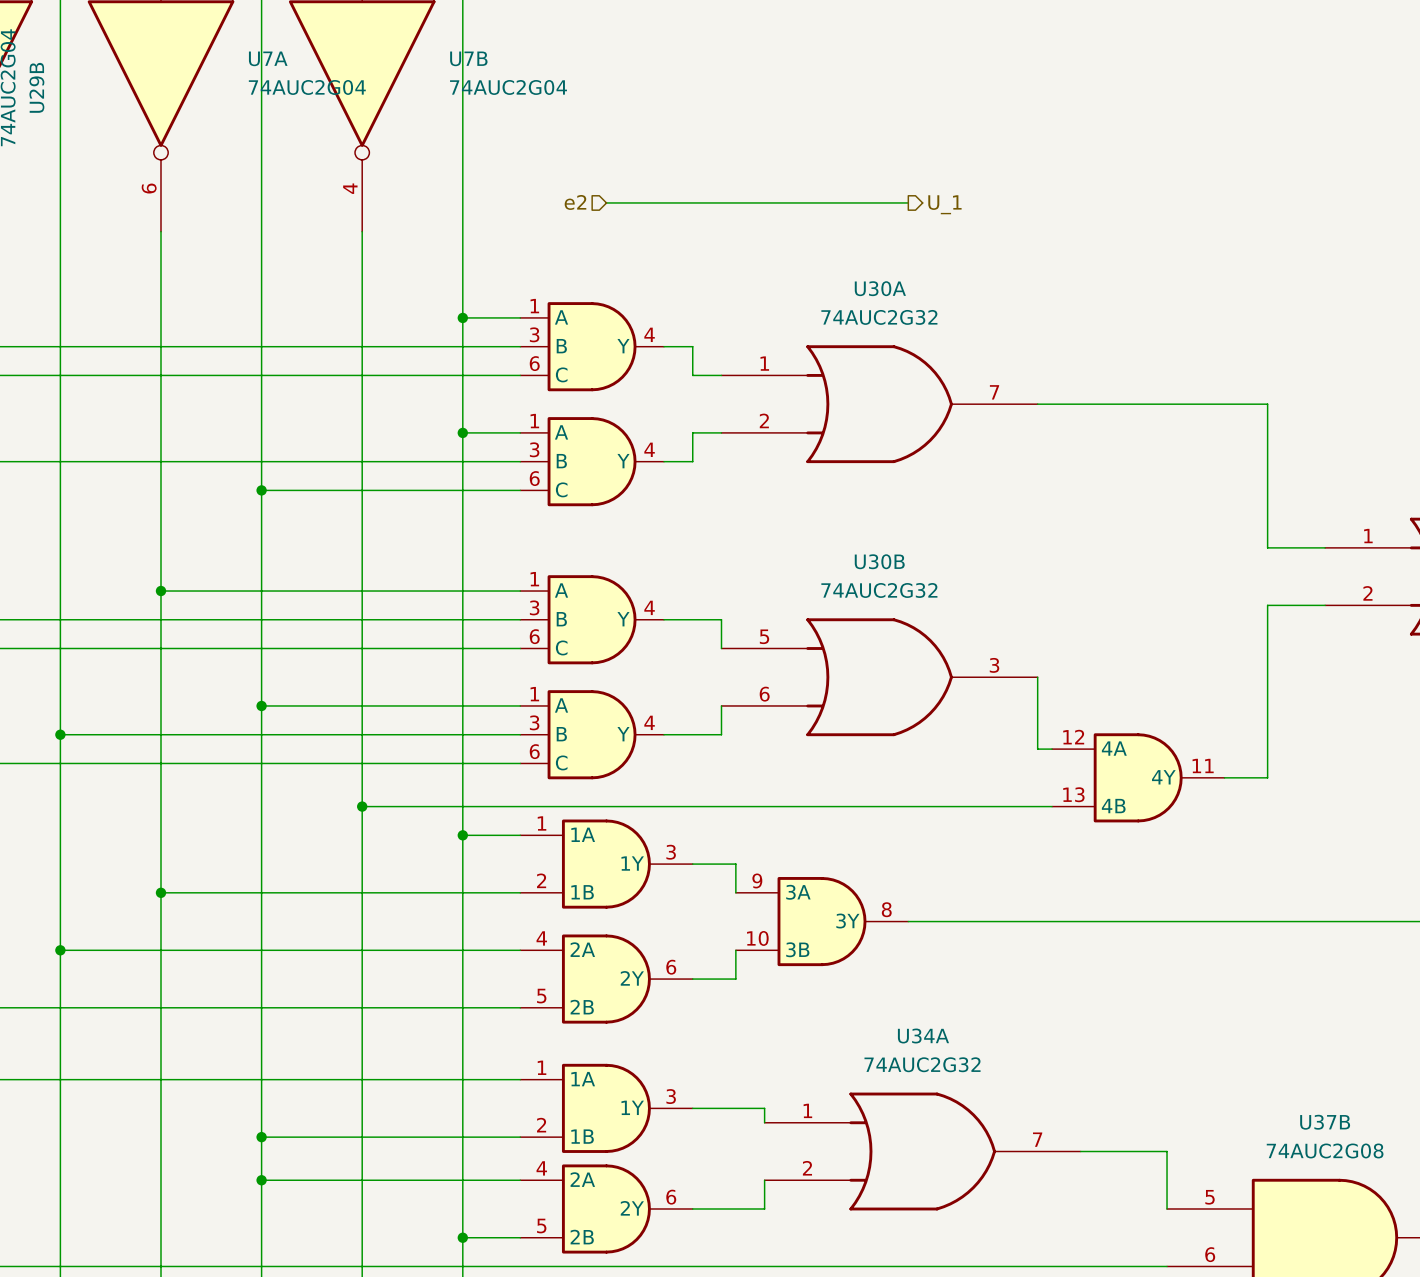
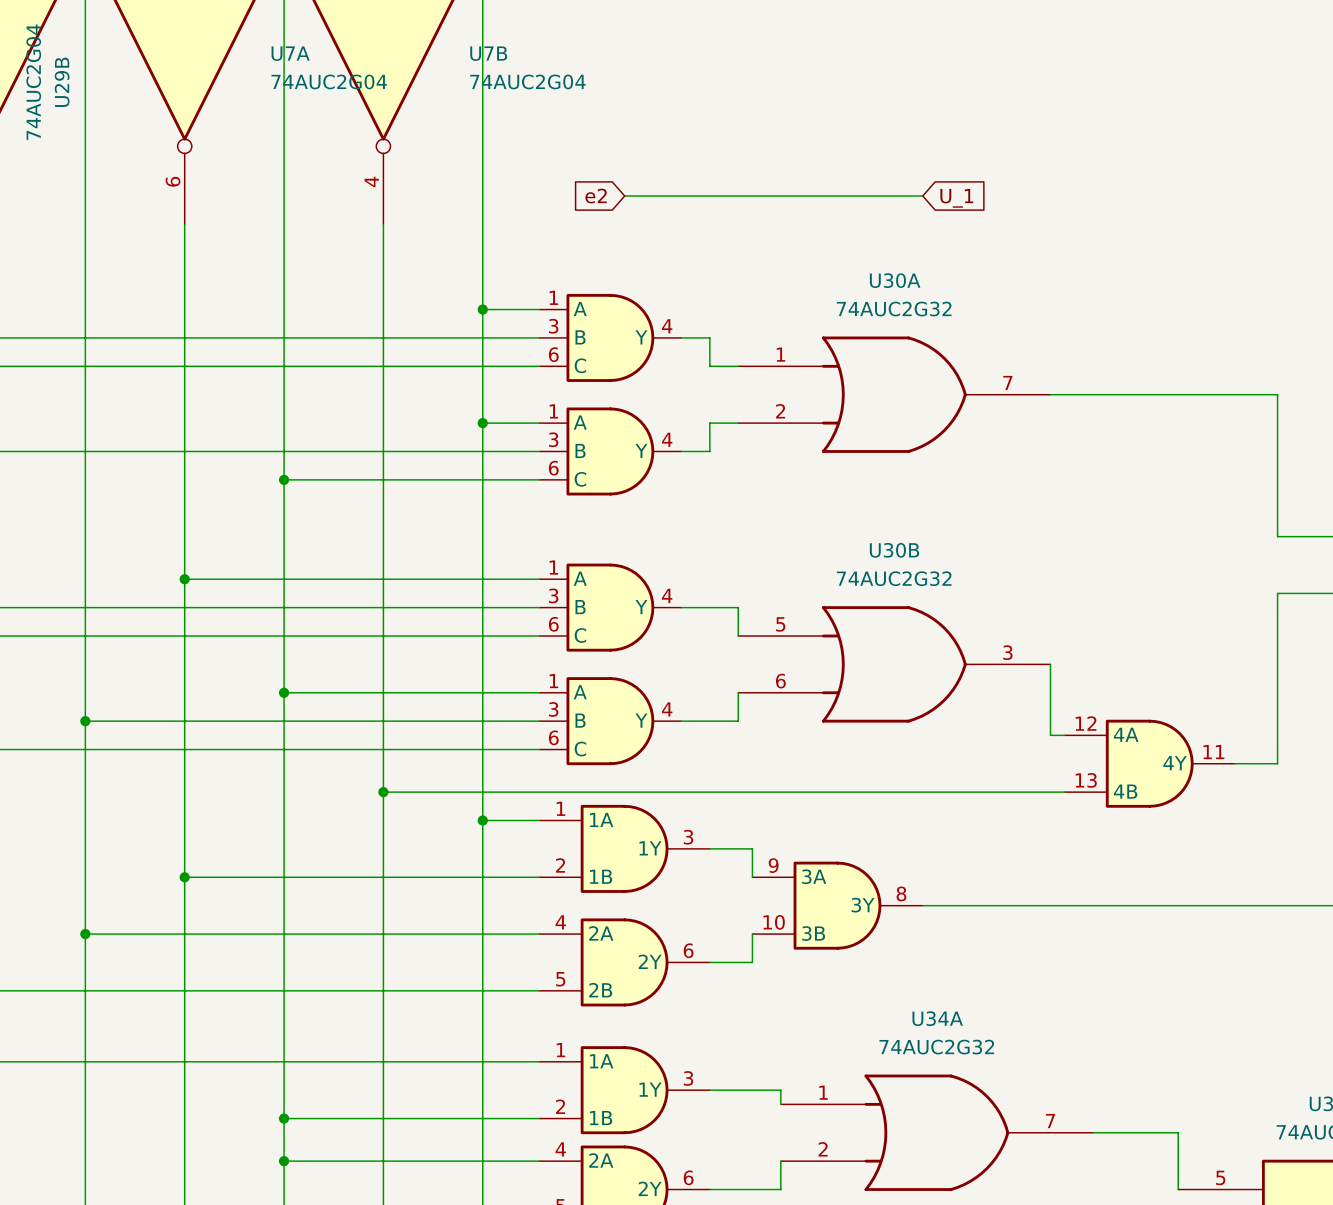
hierarchical label: e2 (575, 202) -> none
global label: none -> e2 (596, 196)
hierarchical label: U_1 (944, 204) -> none
global label: none -> U_1 (956, 198)

